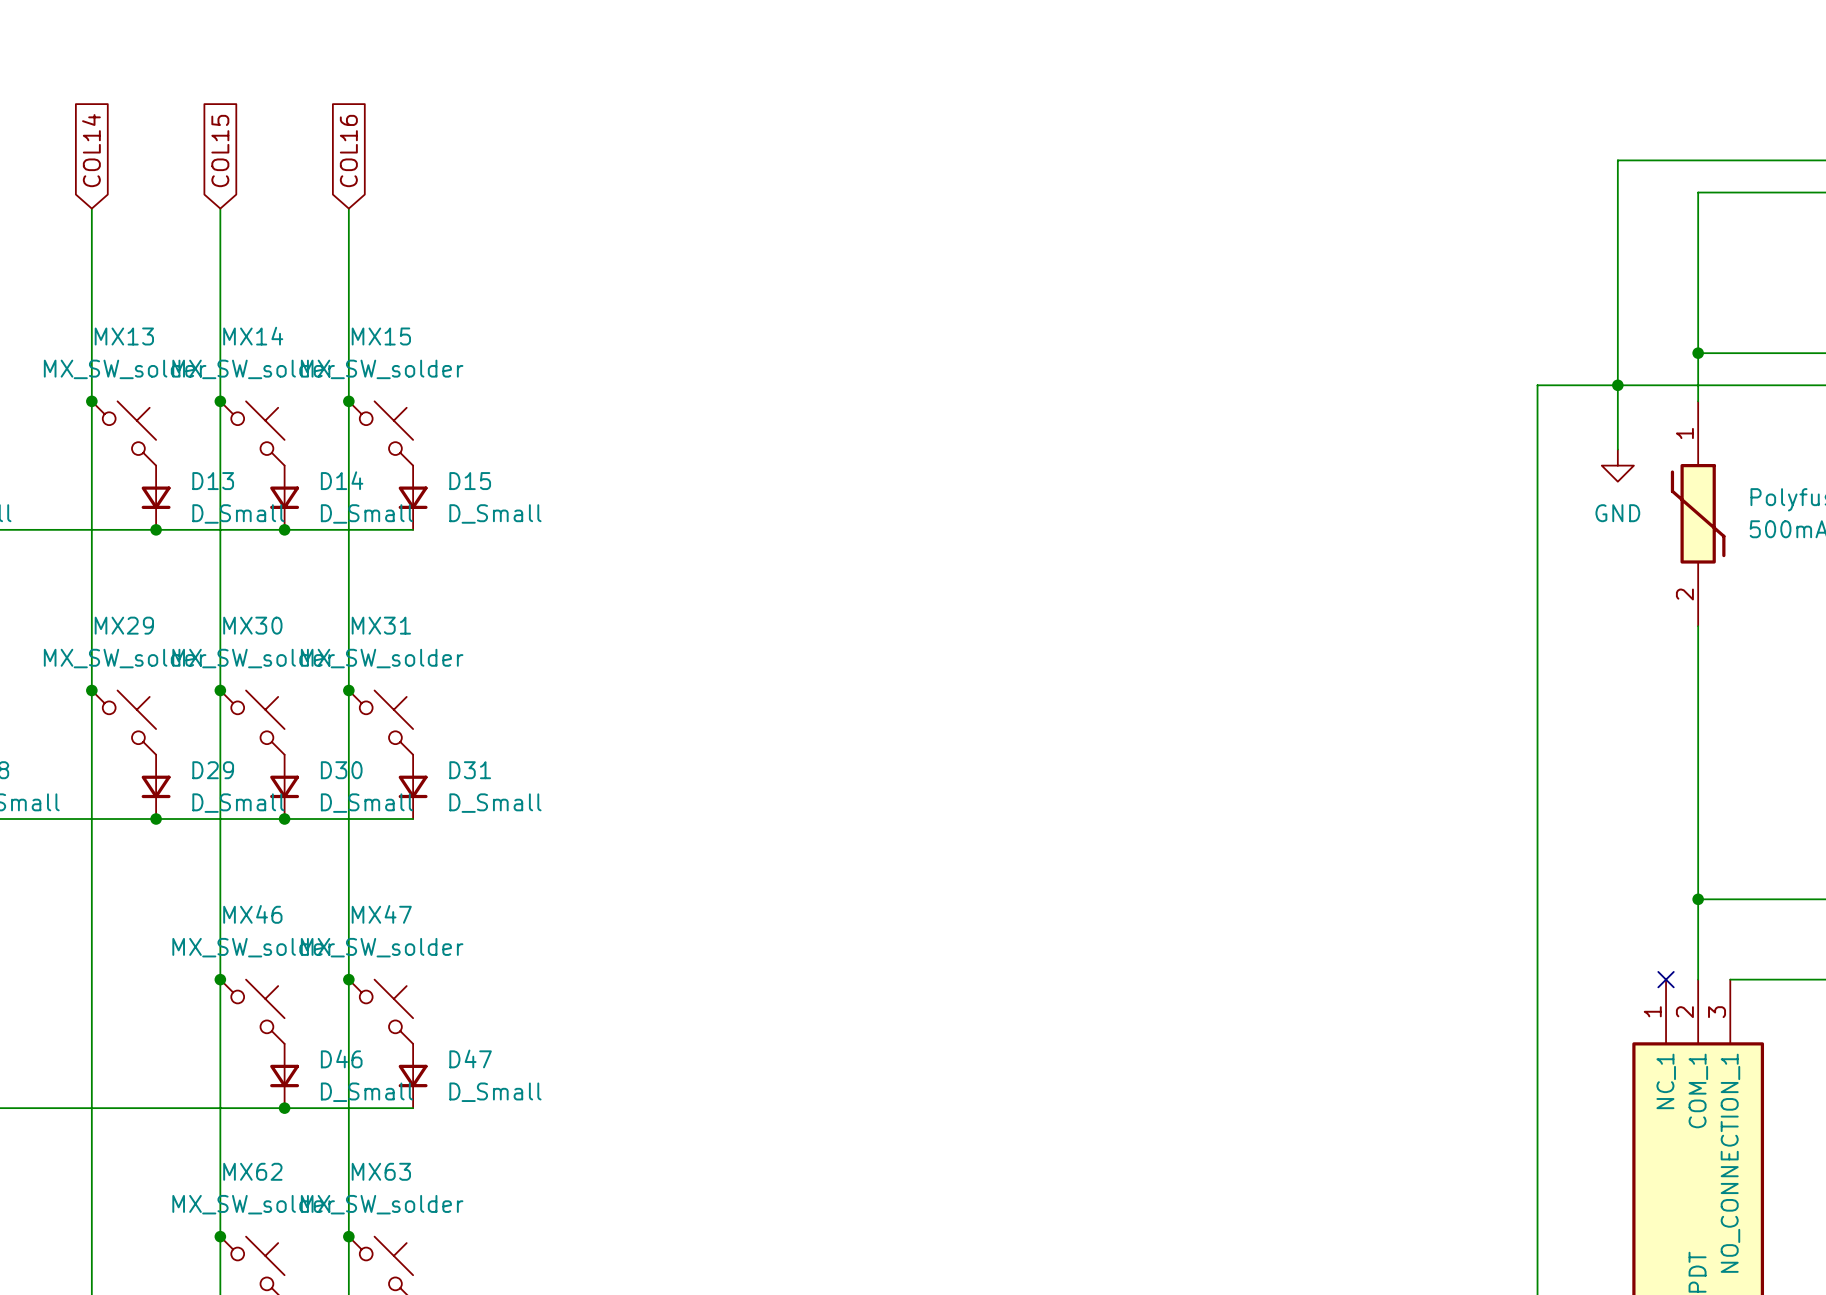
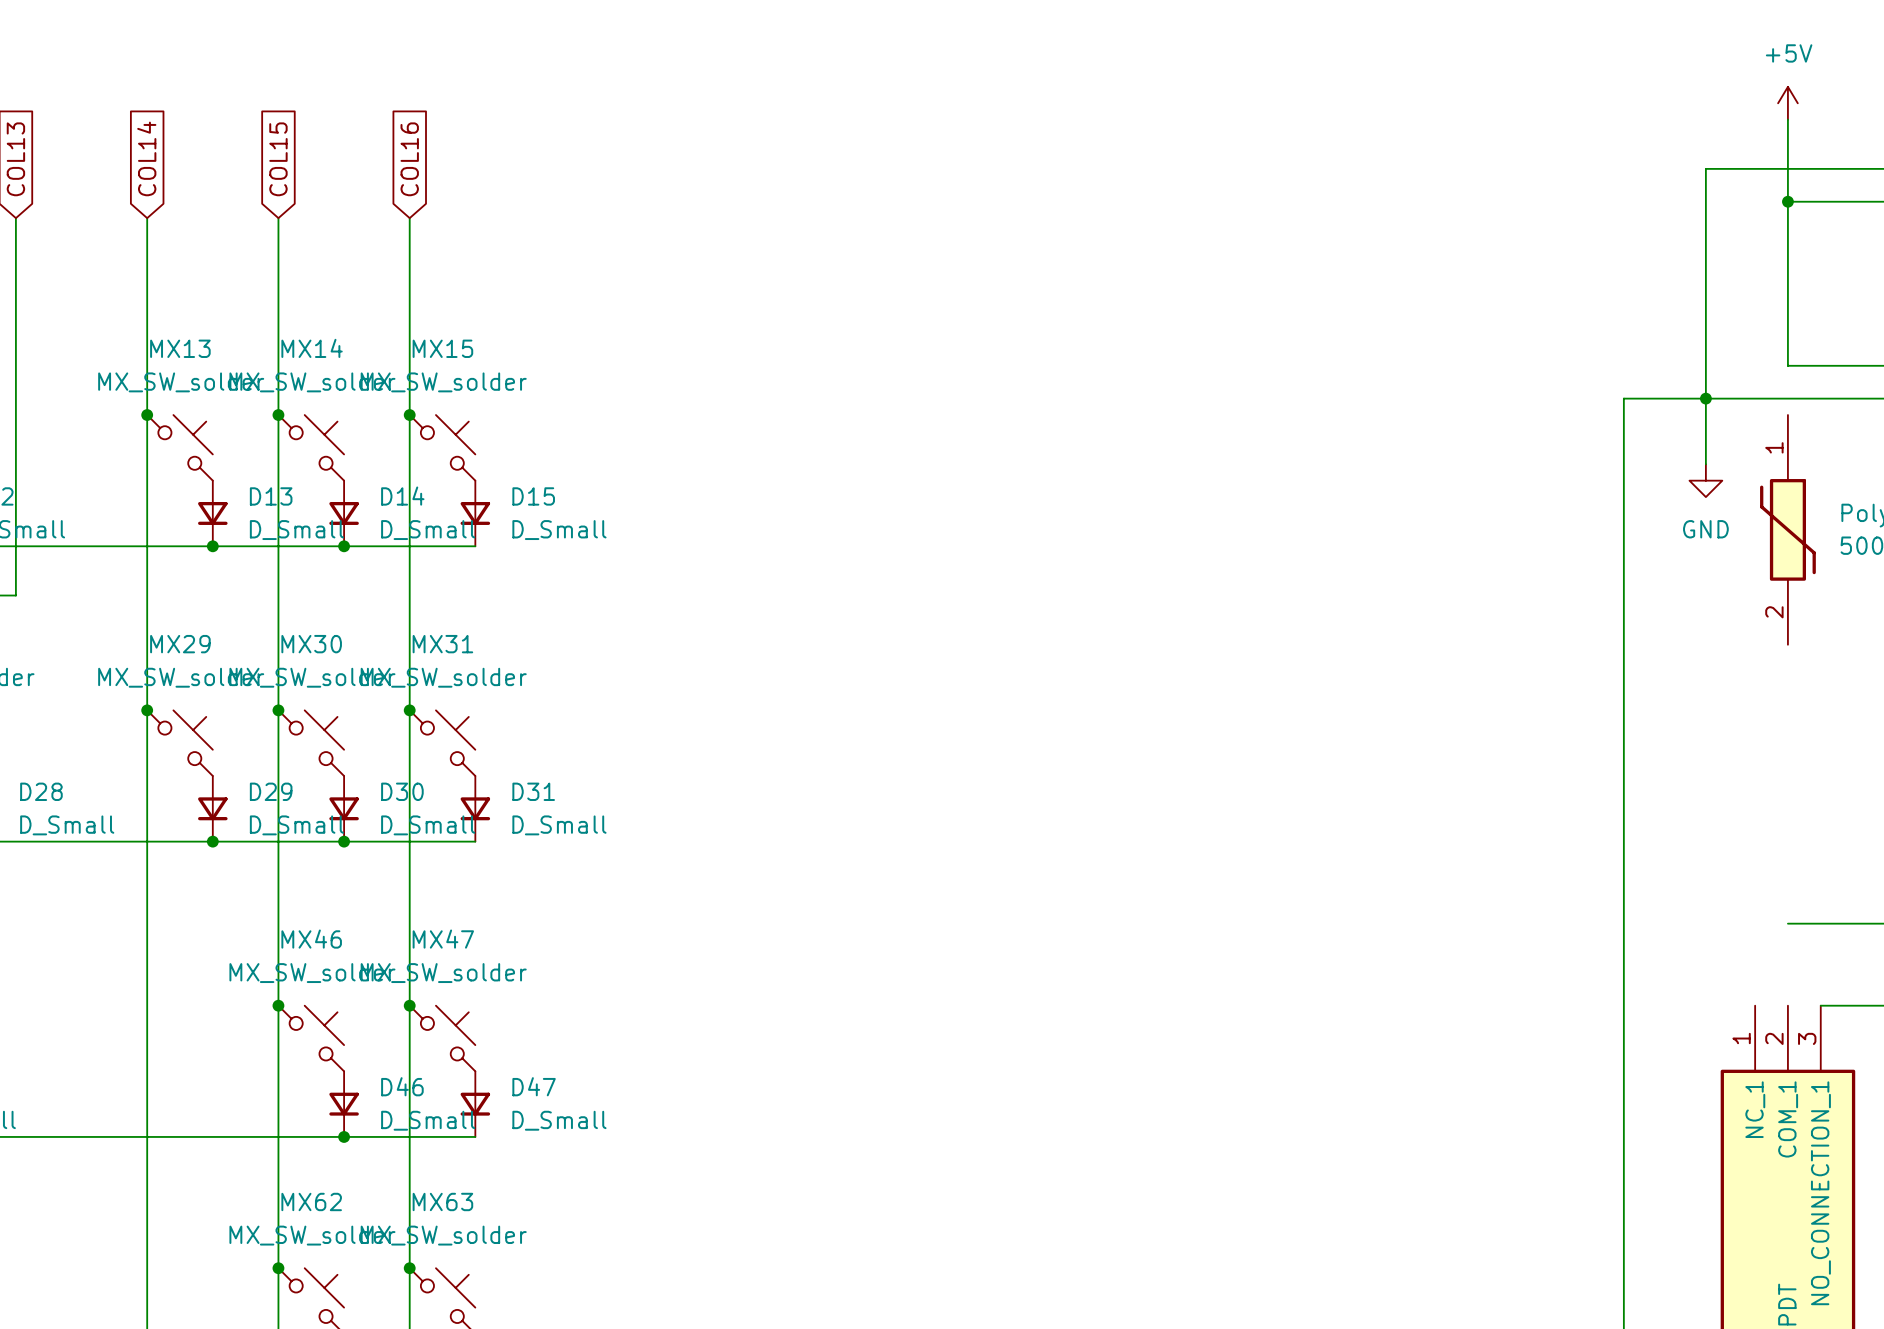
power symbol: none -> +5V (1787, 103)
wire: none -> (1787, 119) (1787, 201)
junction: none -> (1787, 201)
wire: (1698, 353) (1698, 401) -> none
junction: (1698, 353) -> none
wire: (1698, 626) (1698, 979) -> none
junction: (1698, 899) -> none
no-connect mark: (1666, 979) -> none

